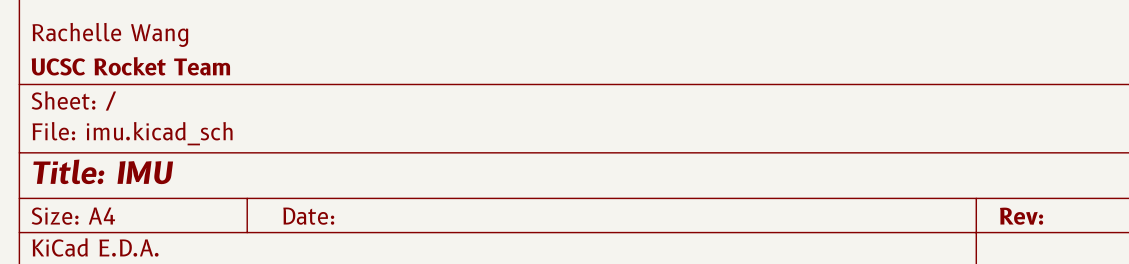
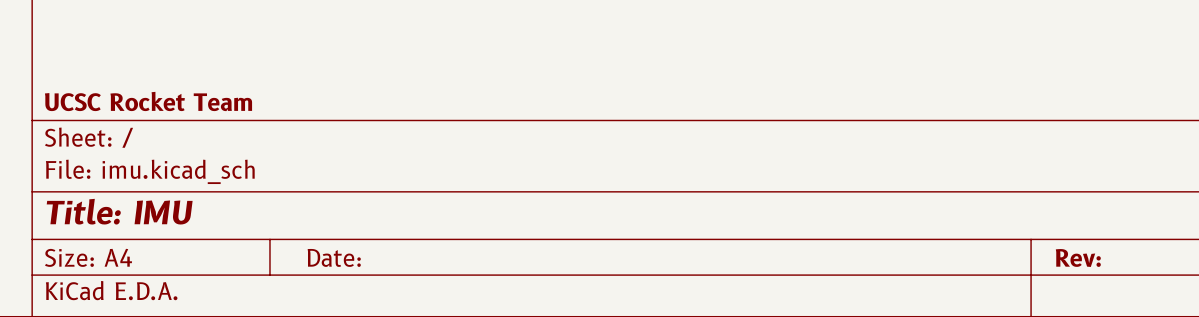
title block: Rachelle Wang (110, 34) -> none

